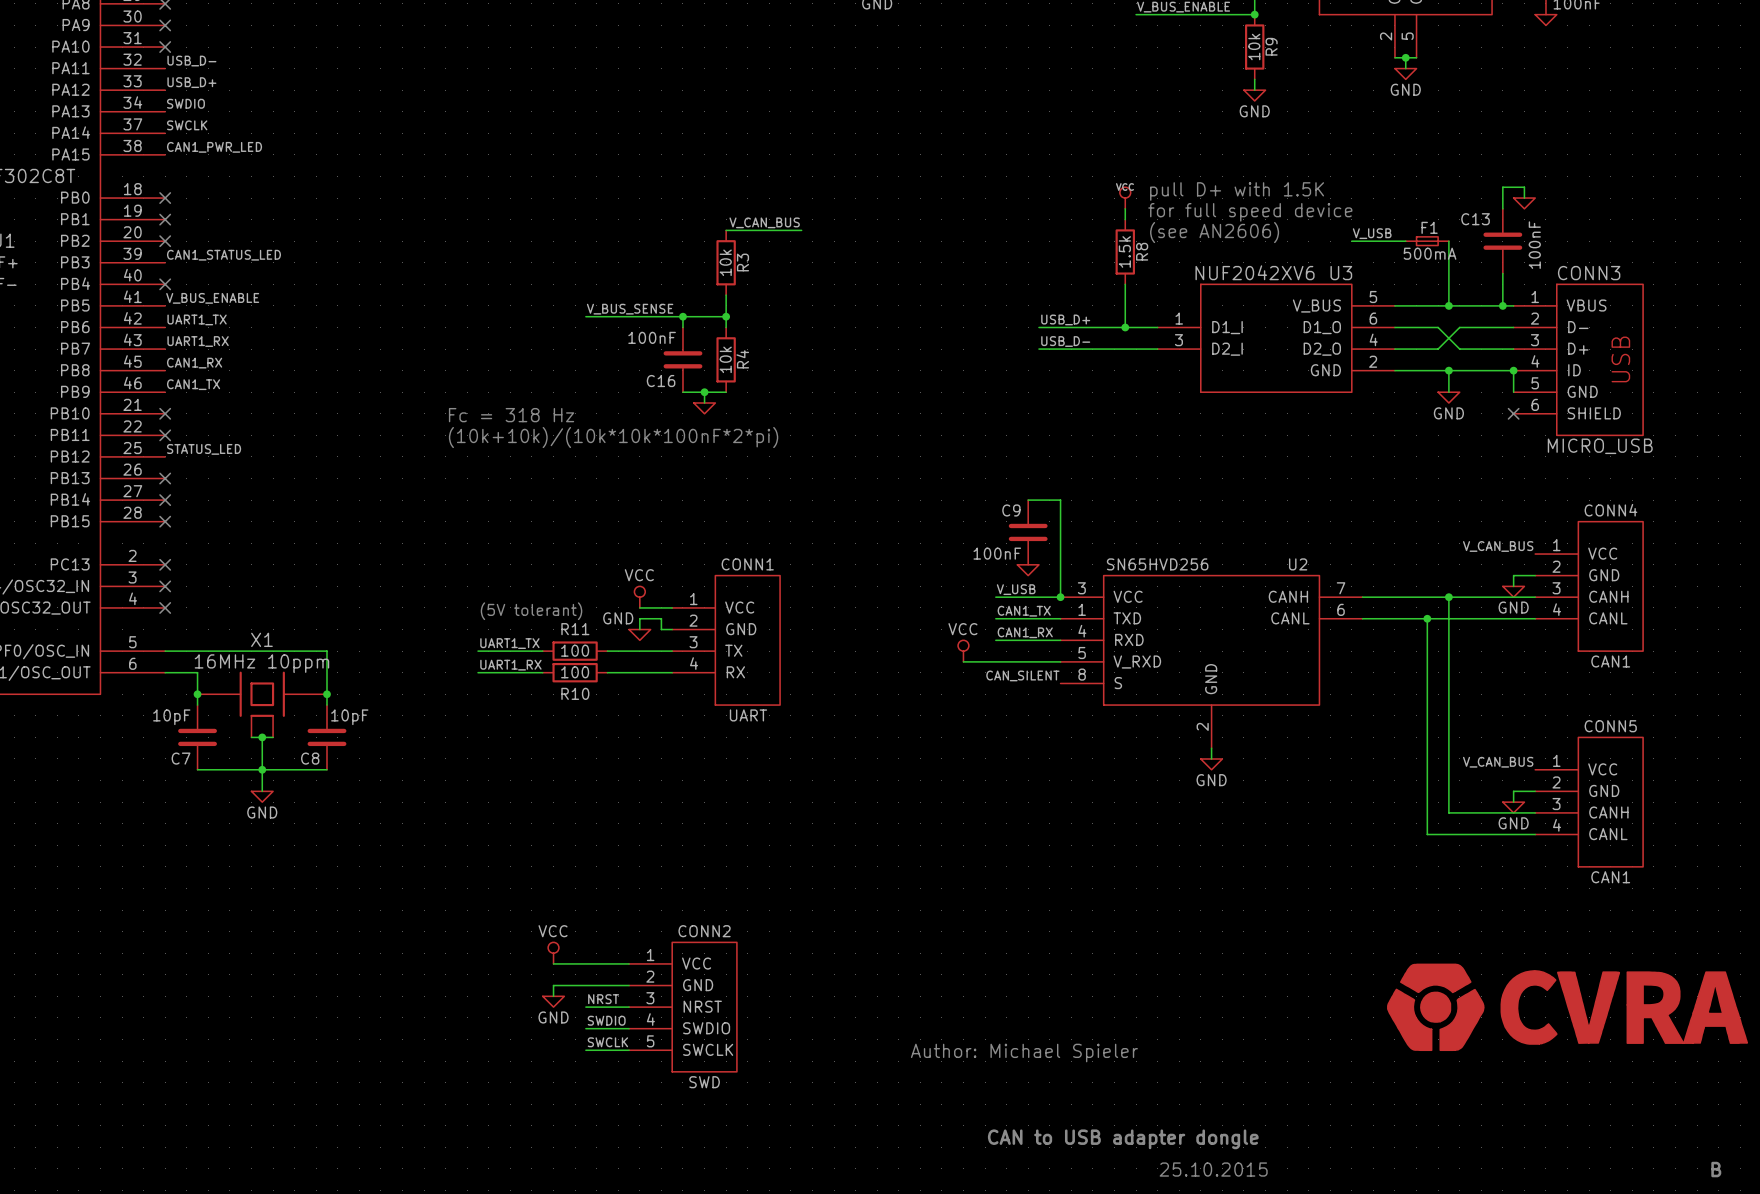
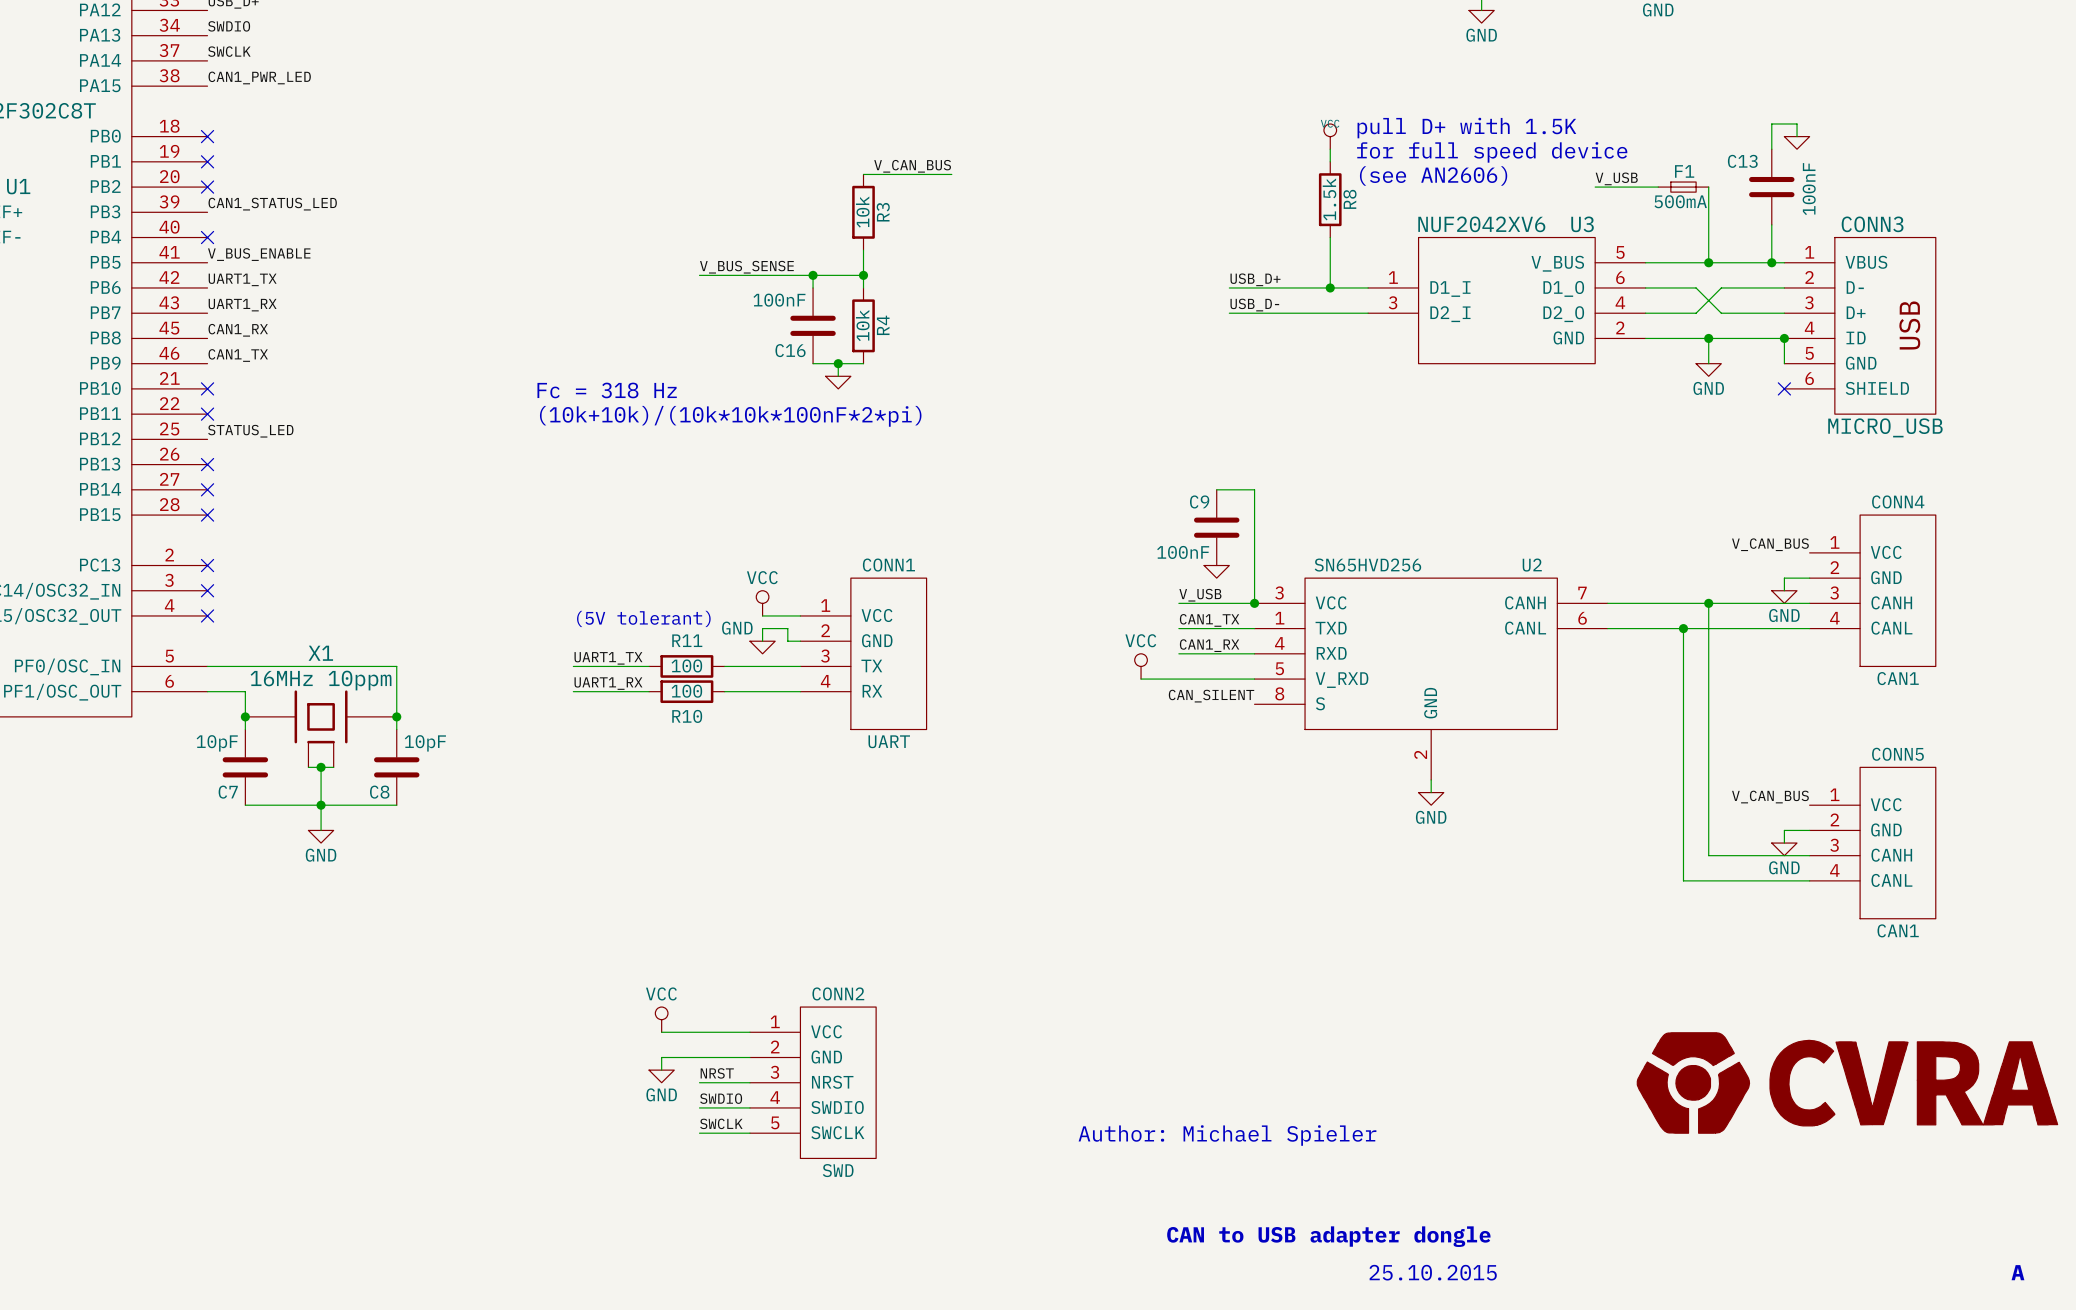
text: B (1716, 1169) -> A (2017, 1272)

